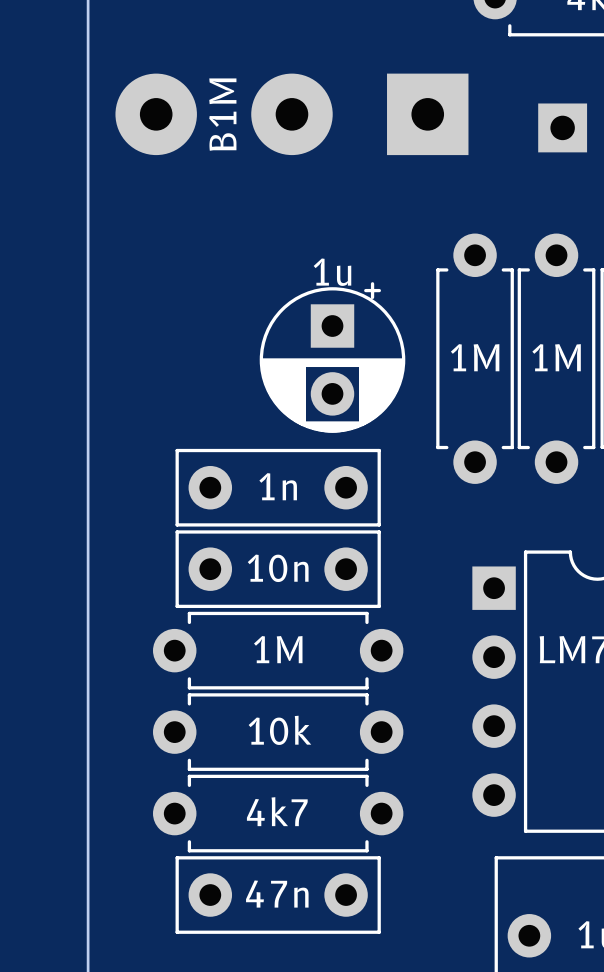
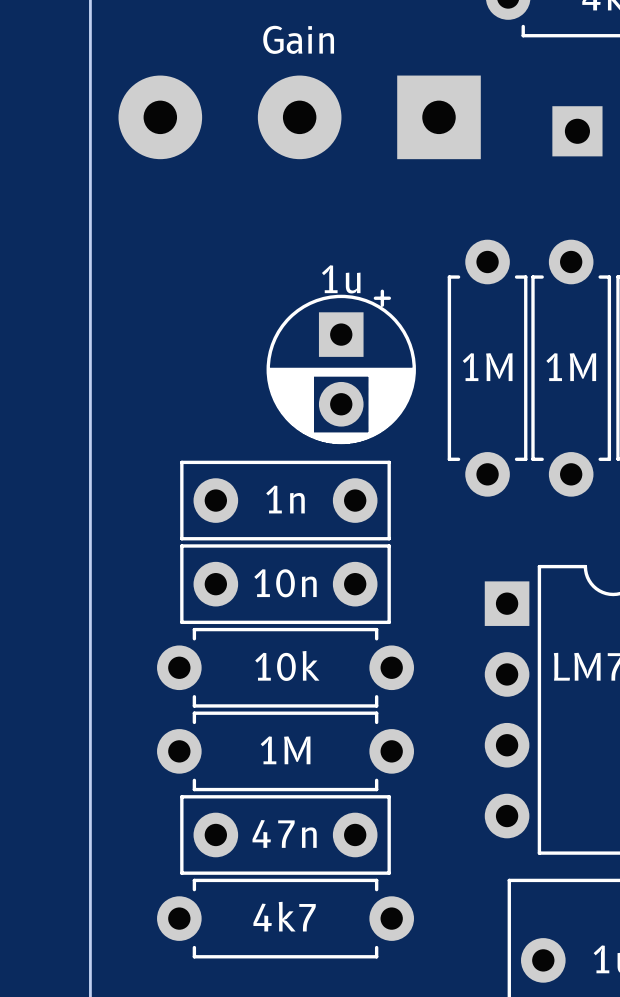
Gain name: none -> Gain (298, 39)
Gain value: B1M (222, 114) -> none
part value: 1M (278, 649) -> 10k (287, 665)
part value: 10k (279, 730) -> 1M (285, 750)
part footprint: [153, 774, 404, 853] -> [180, 795, 391, 875]
part value: 4k7 (277, 811) -> 47n (284, 833)
part footprint: [175, 856, 381, 934] -> [157, 878, 414, 959]
part value: 47n (277, 894) -> 4k7 (284, 916)

